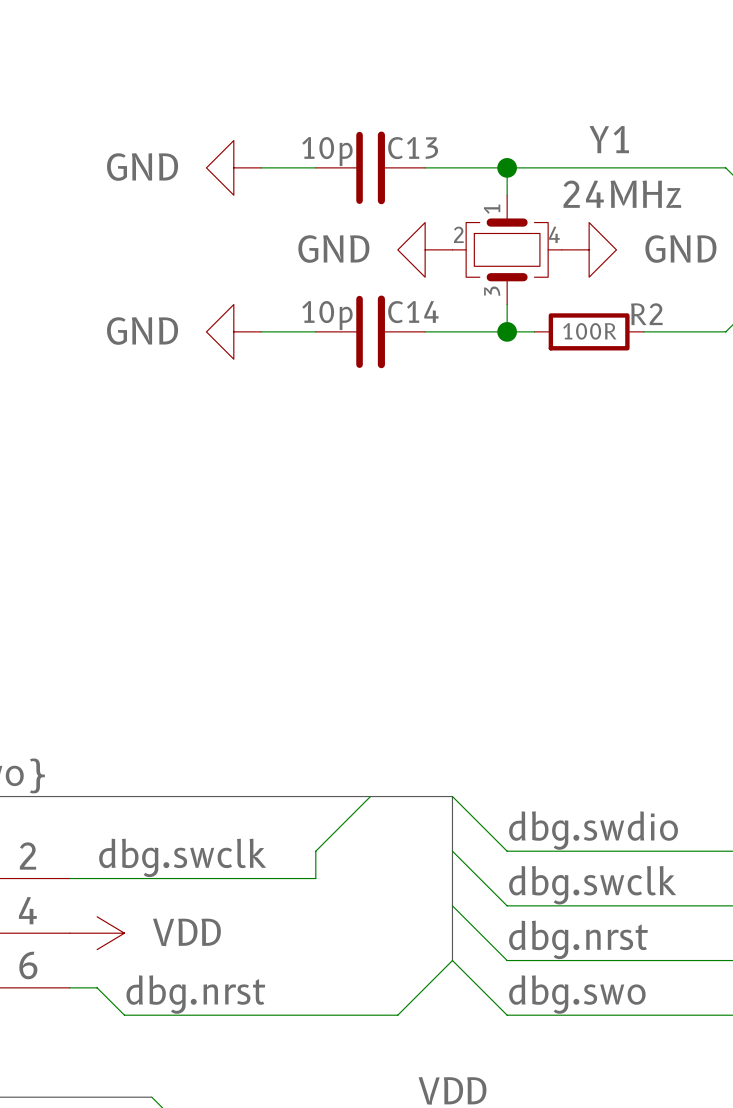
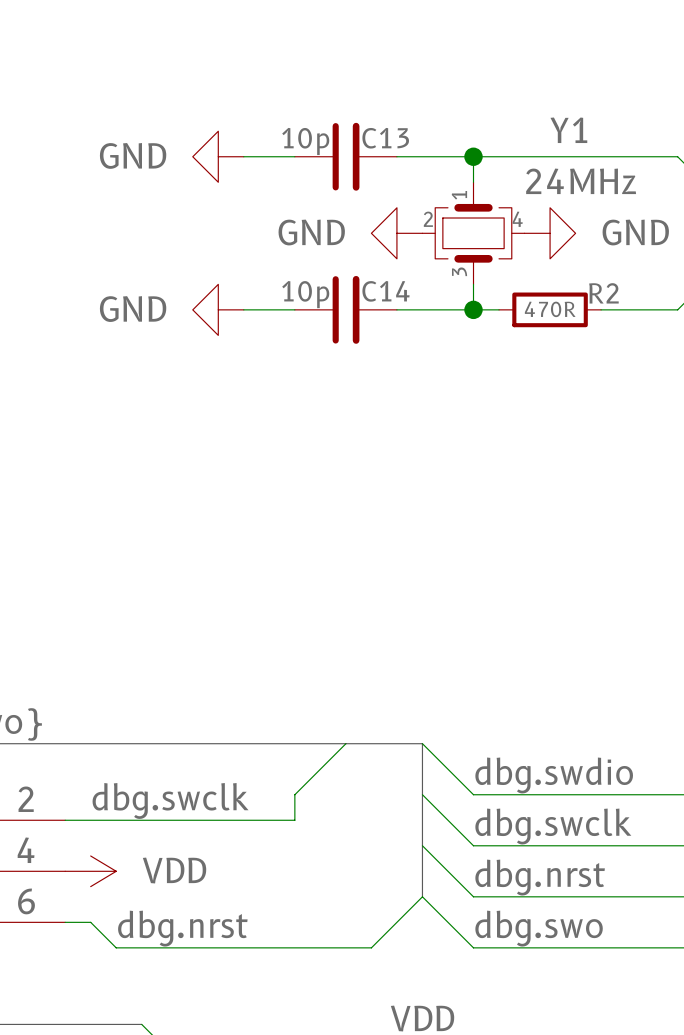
R2 value: 100R (589, 331) -> 470R (550, 309)

